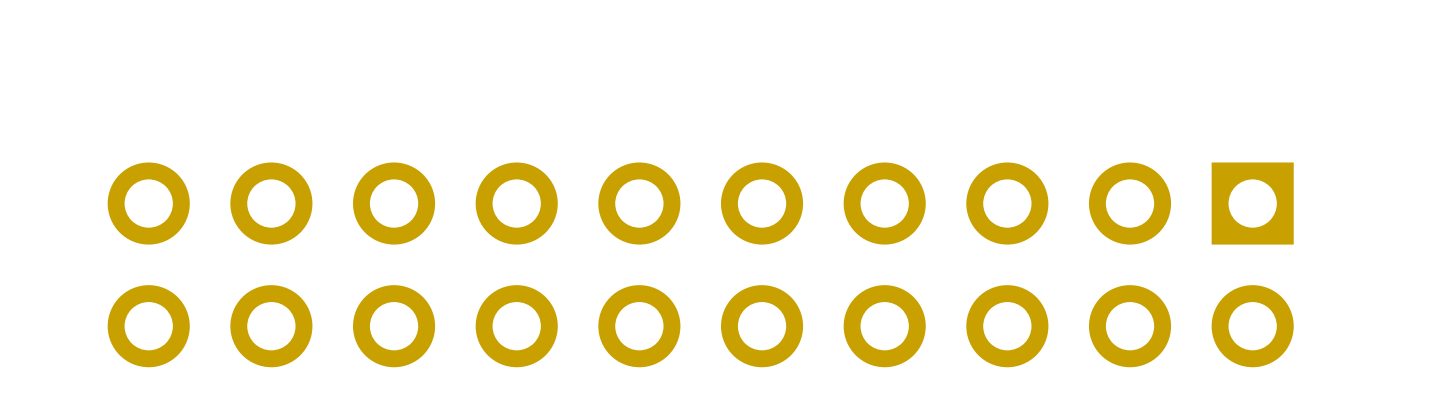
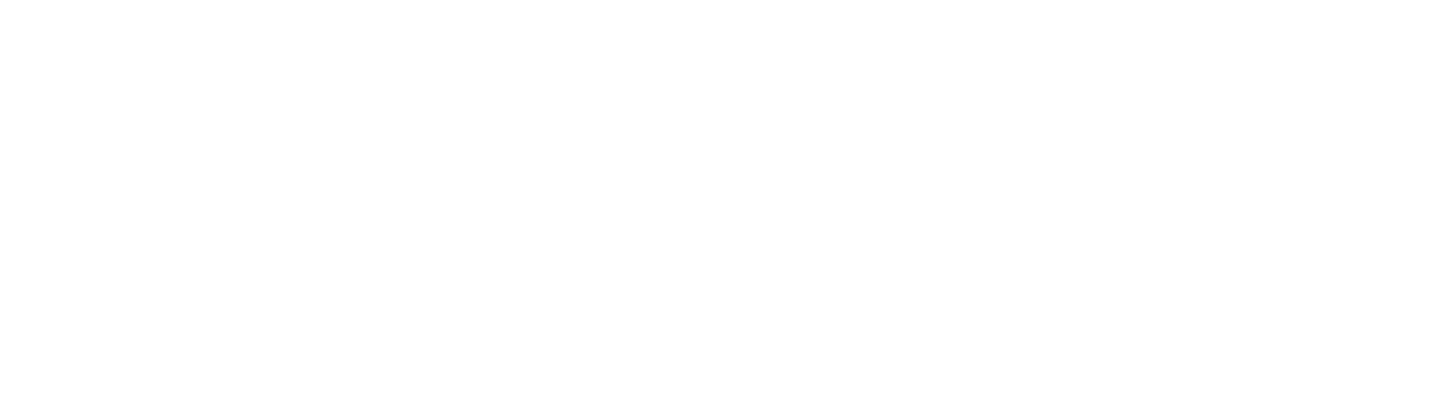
part: (700, 264) -> none

